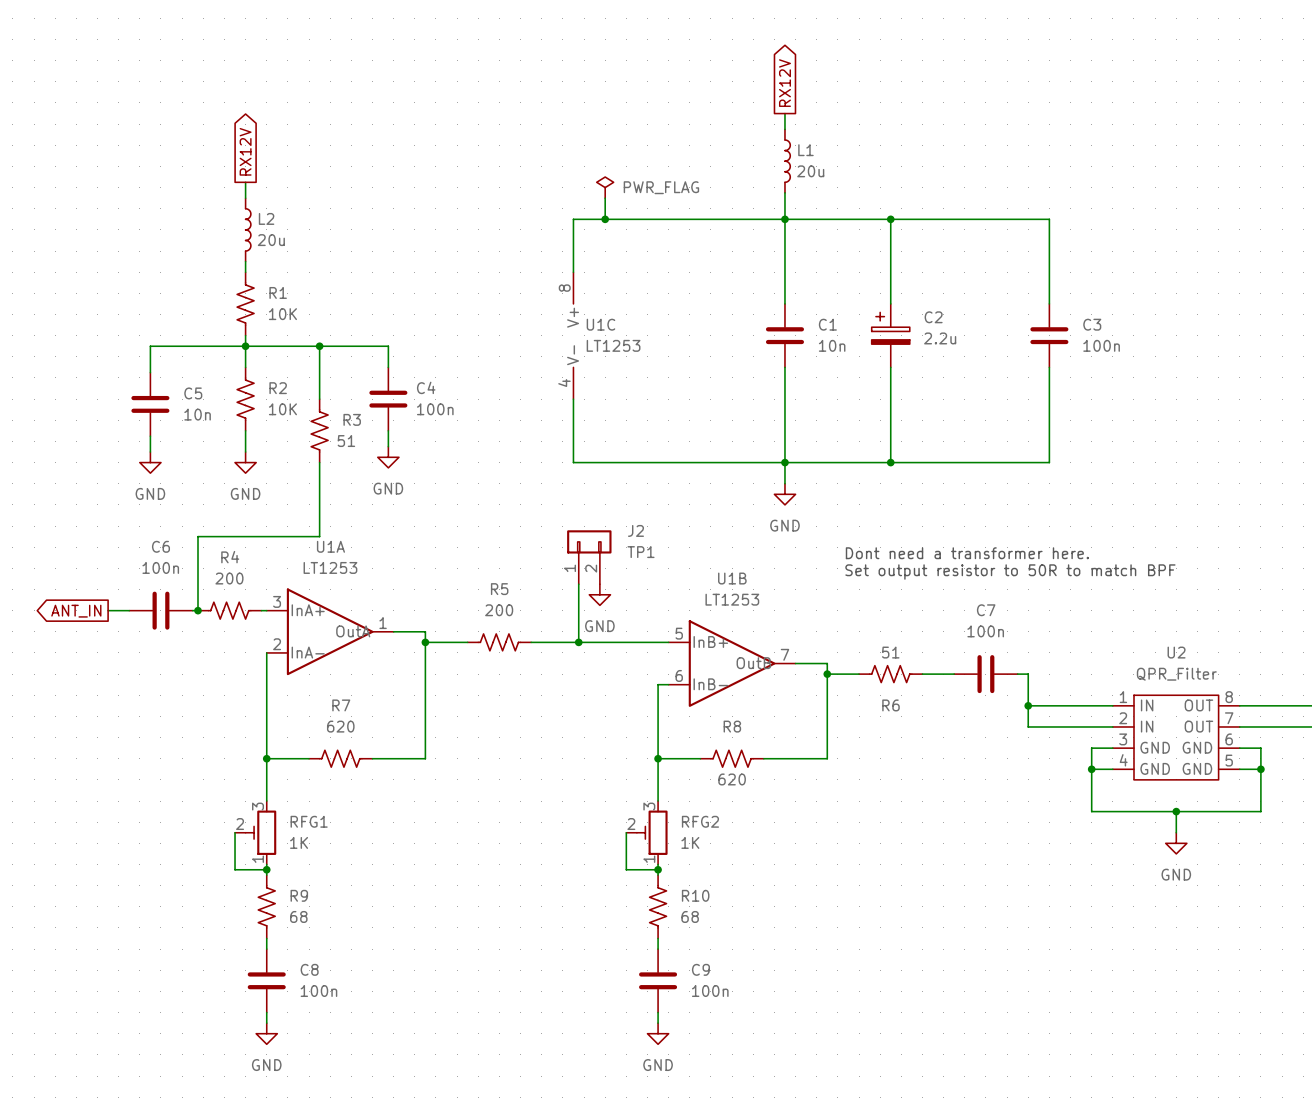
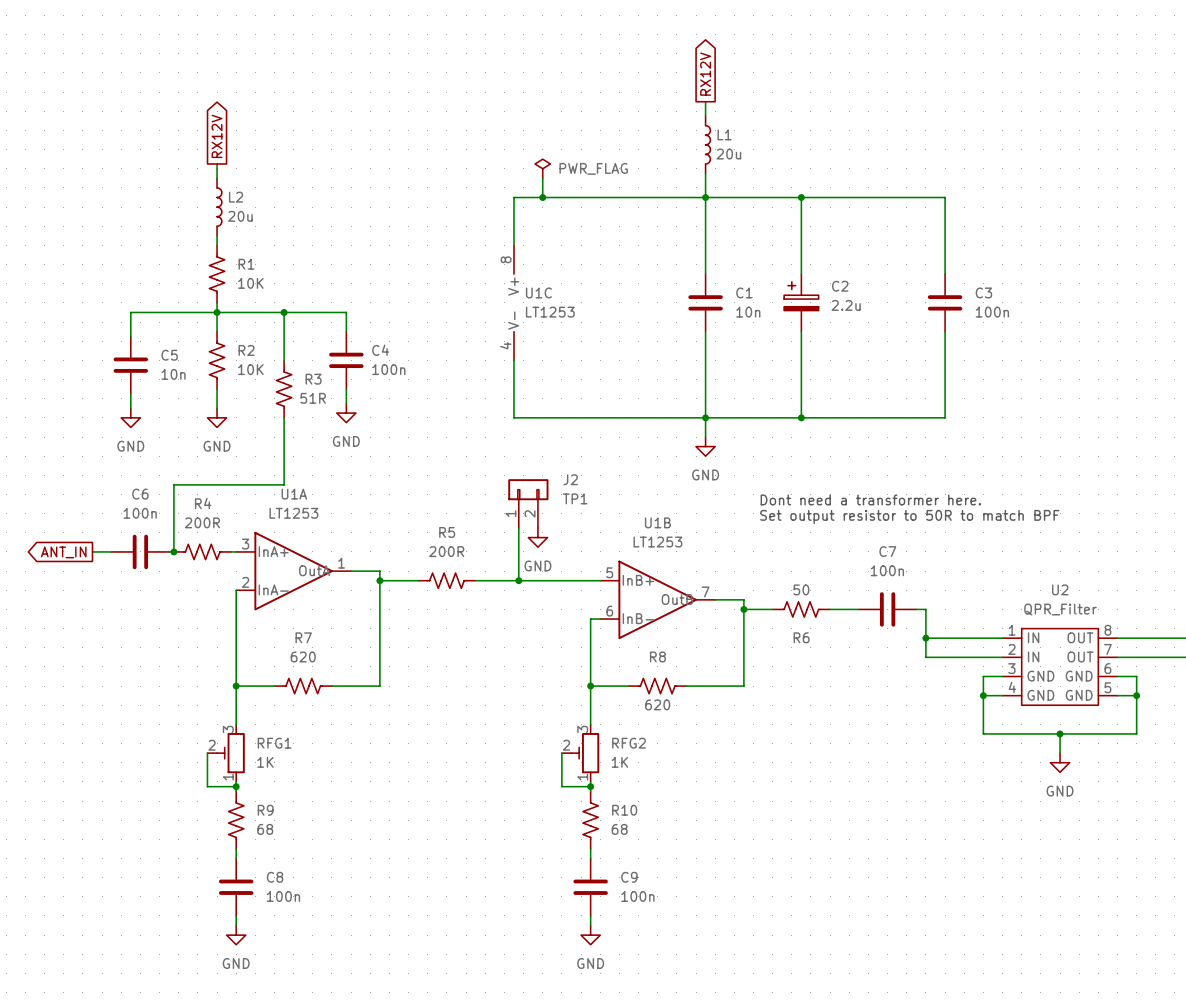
R3 value: 51 (346, 441) -> 51R (313, 398)
R4 value: 200 (229, 578) -> 200R (202, 522)
R5 value: 200 (499, 610) -> 200R (446, 551)
R6 value: 51 (890, 652) -> 50 (801, 589)

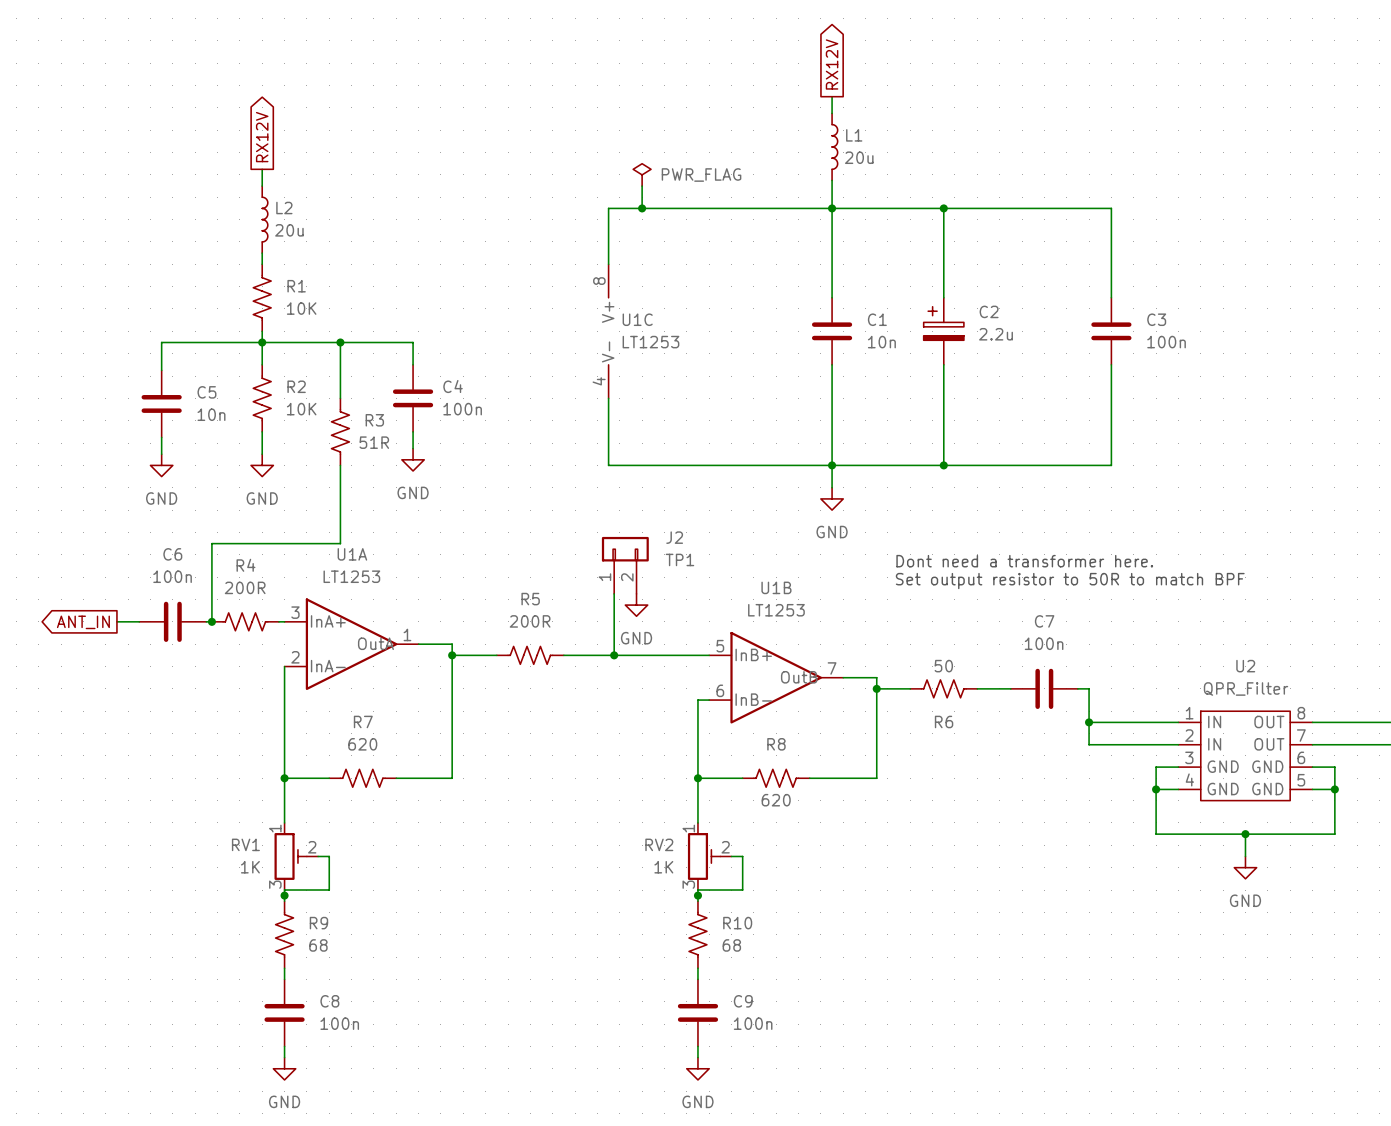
wire: (207, 753) (207, 786) (236, 786) -> none
RFG1: 1K (226, 753) -> none
RV1: none -> 1K (296, 856)
wire: none -> (318, 856) (329, 856) (329, 890) (284, 890)
wire: (561, 753) (561, 786) (590, 786) -> none
RFG2: 1K (580, 753) -> none
RV2: none -> 1K (709, 856)
wire: none -> (731, 856) (742, 856) (742, 890) (697, 890)

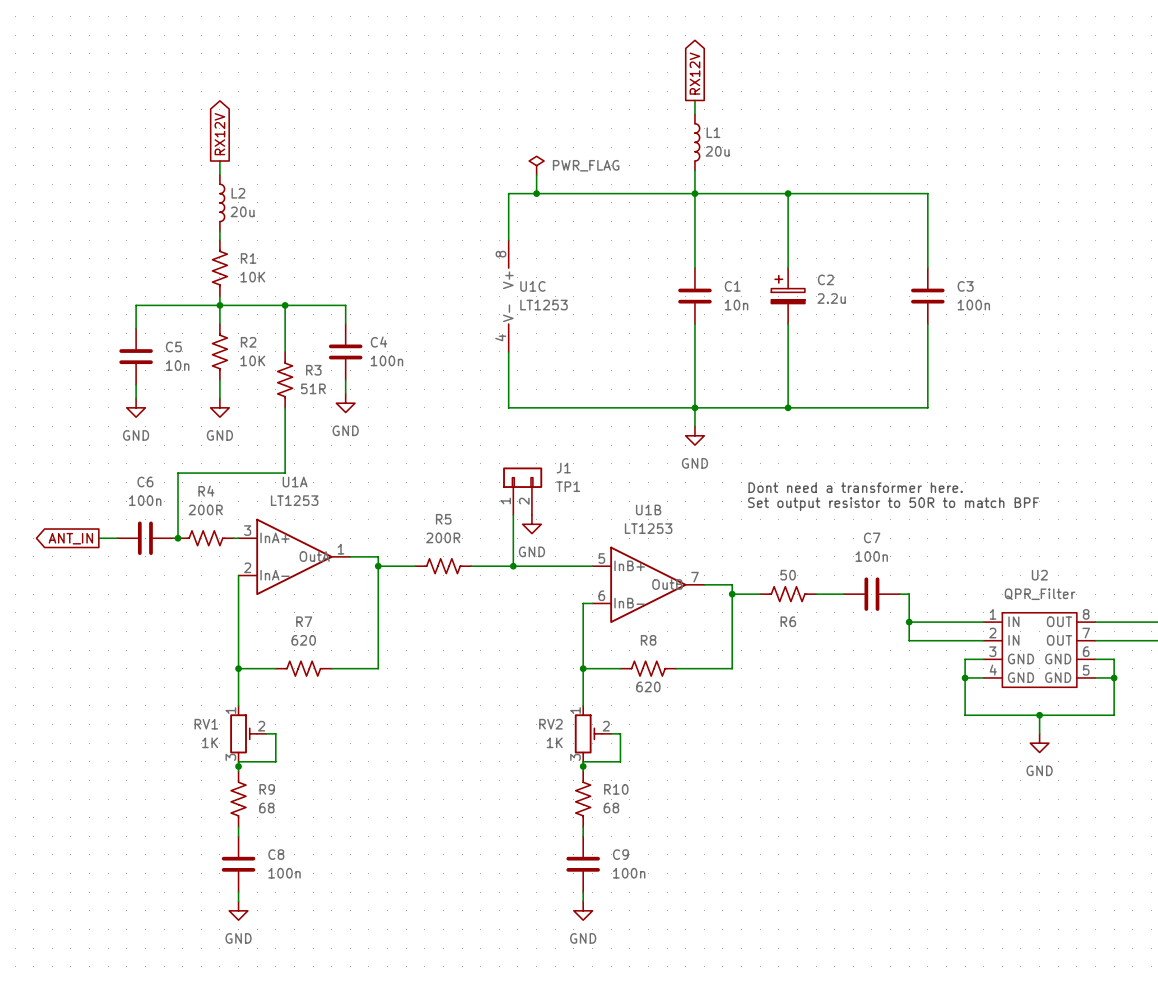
J2 name: J2 (674, 537) -> J1 (563, 468)

